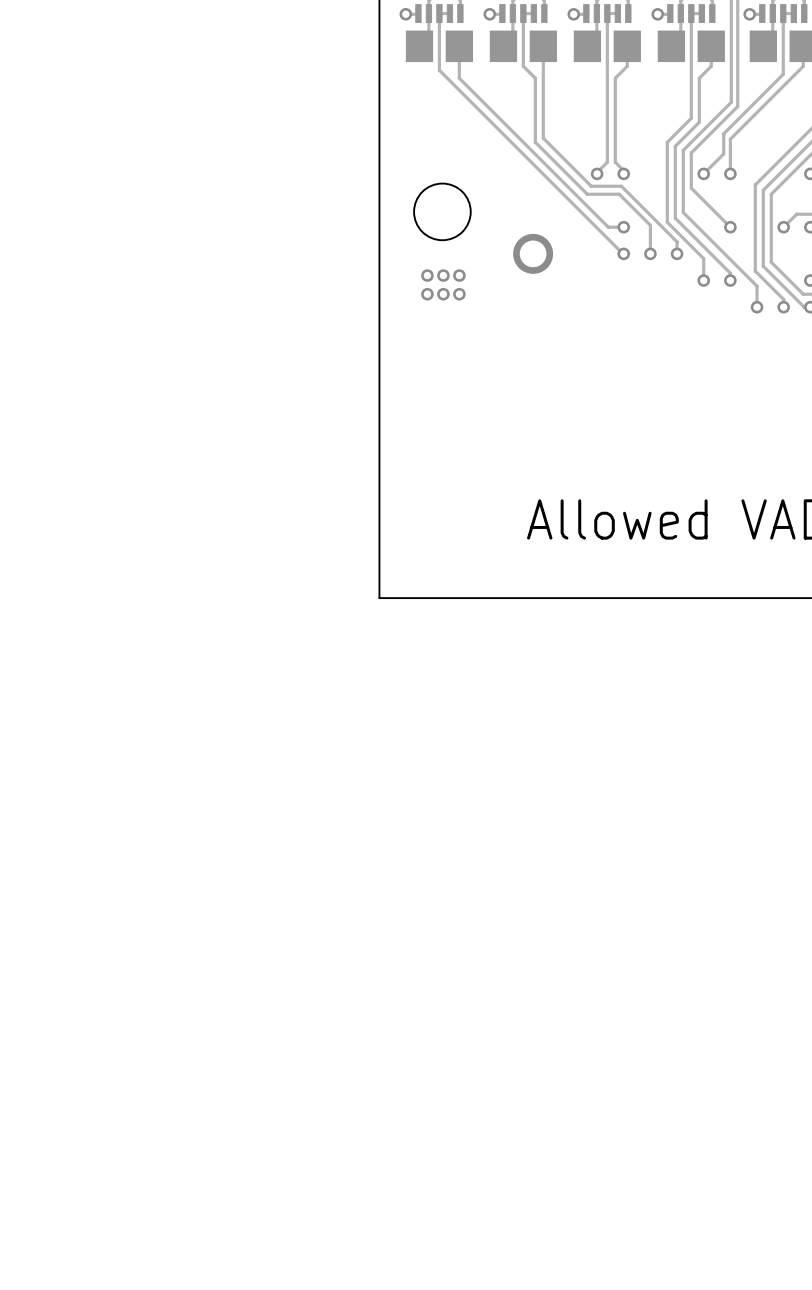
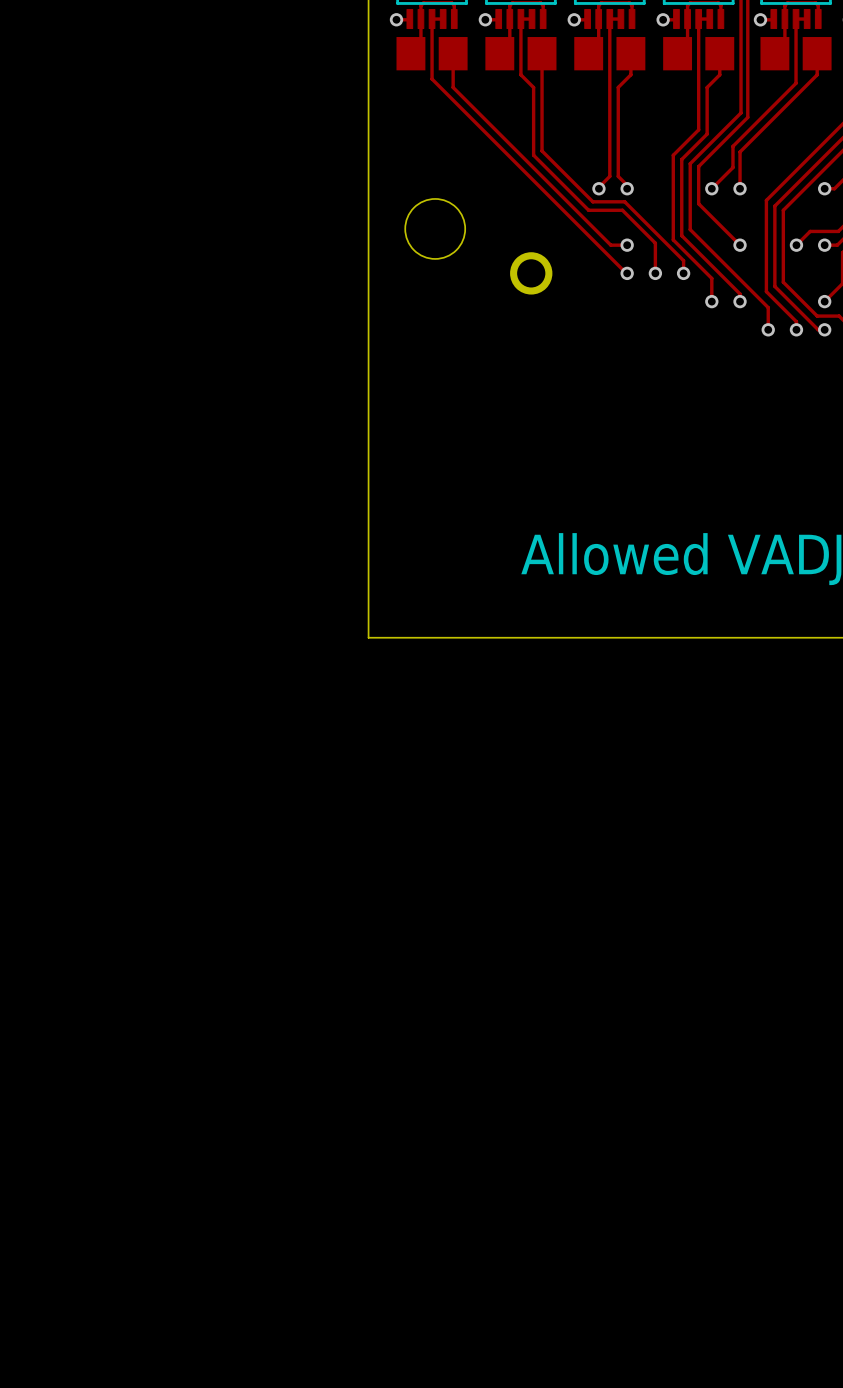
via: (427, 275) -> none
via: (443, 275) -> none
via: (459, 275) -> none
via: (427, 294) -> none
via: (443, 294) -> none
via: (459, 294) -> none

